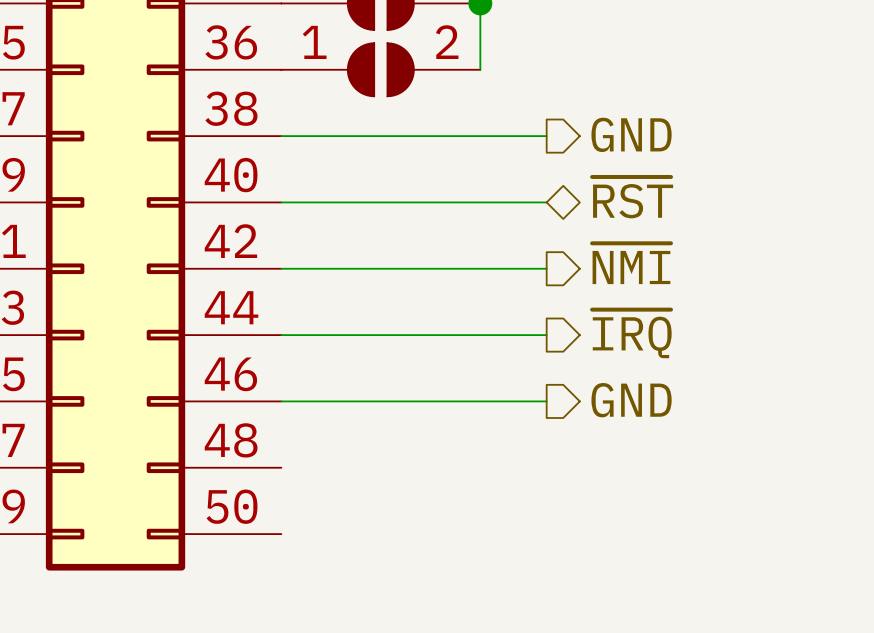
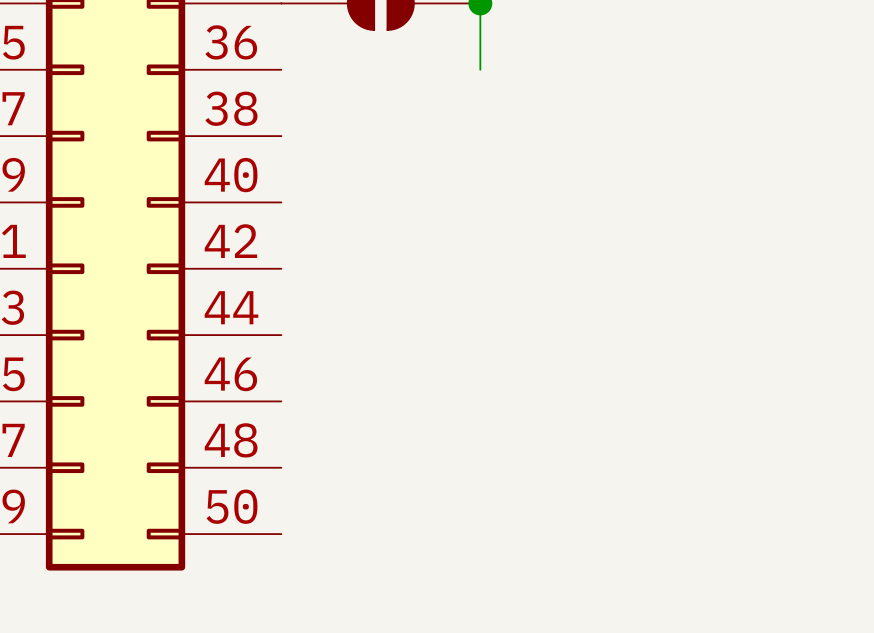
part: (380, 69) -> none
hierarchical label: GND (631, 134) -> none
wire: (281, 136) (546, 136) -> none
hierarchical label: ~{RST} (632, 197) -> none
wire: (281, 202) (546, 202) -> none
hierarchical label: ~{NMI} (631, 263) -> none
wire: (281, 268) (546, 268) -> none
hierarchical label: ~{IRQ} (631, 333) -> none
wire: (281, 335) (546, 335) -> none
hierarchical label: GND (631, 400) -> none
wire: (281, 401) (546, 401) -> none

